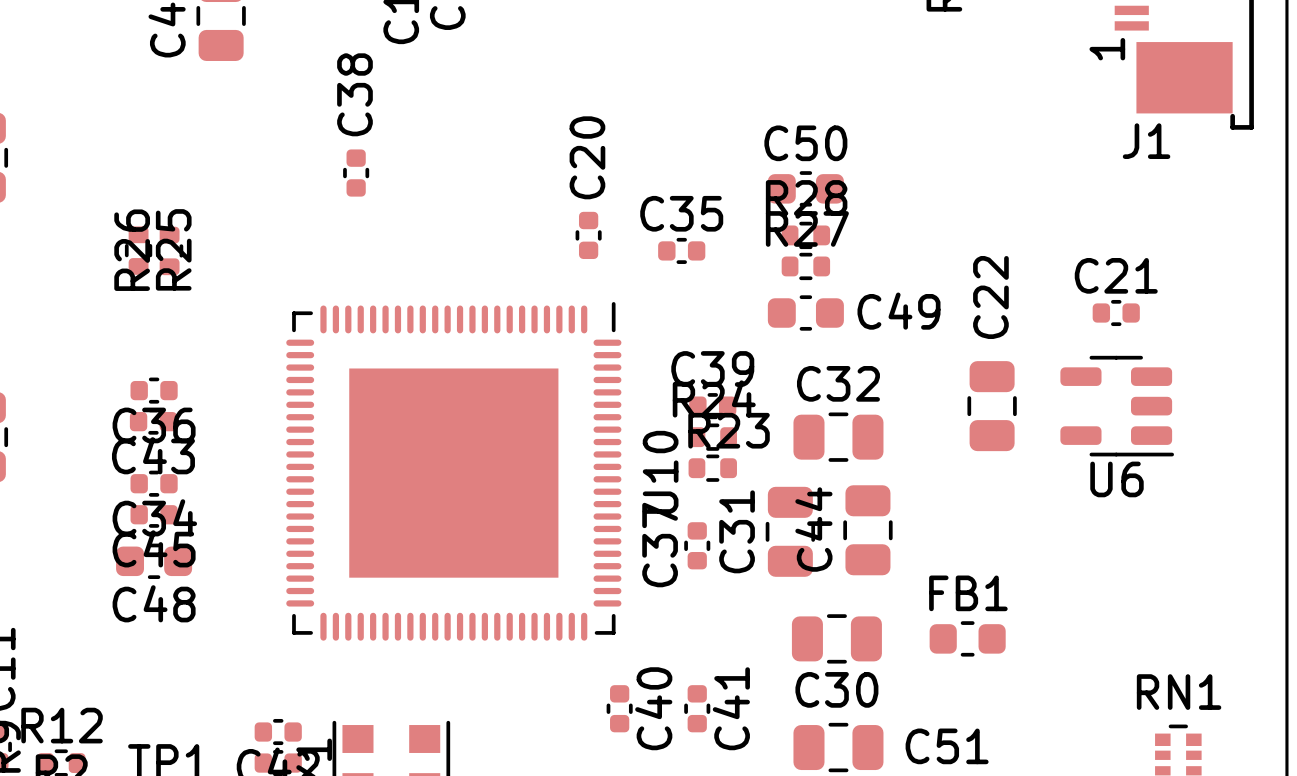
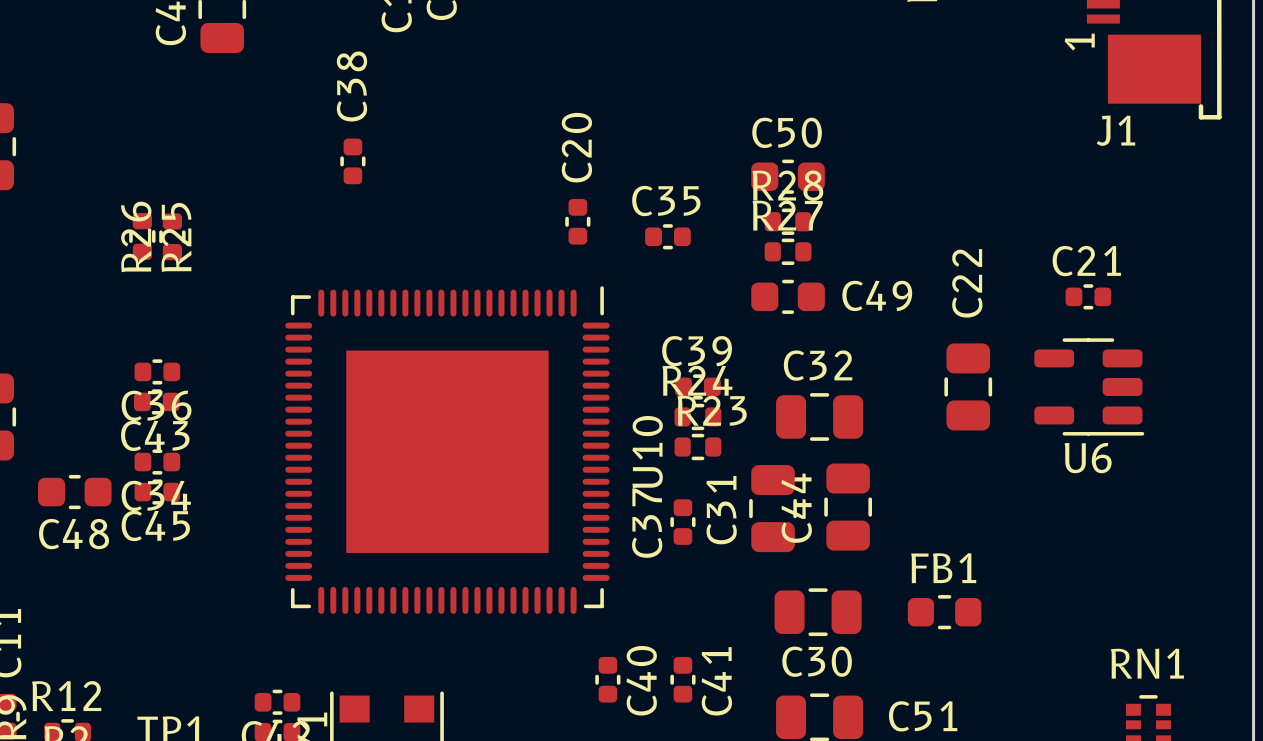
C48 position: (154, 561) -> (74, 492)

